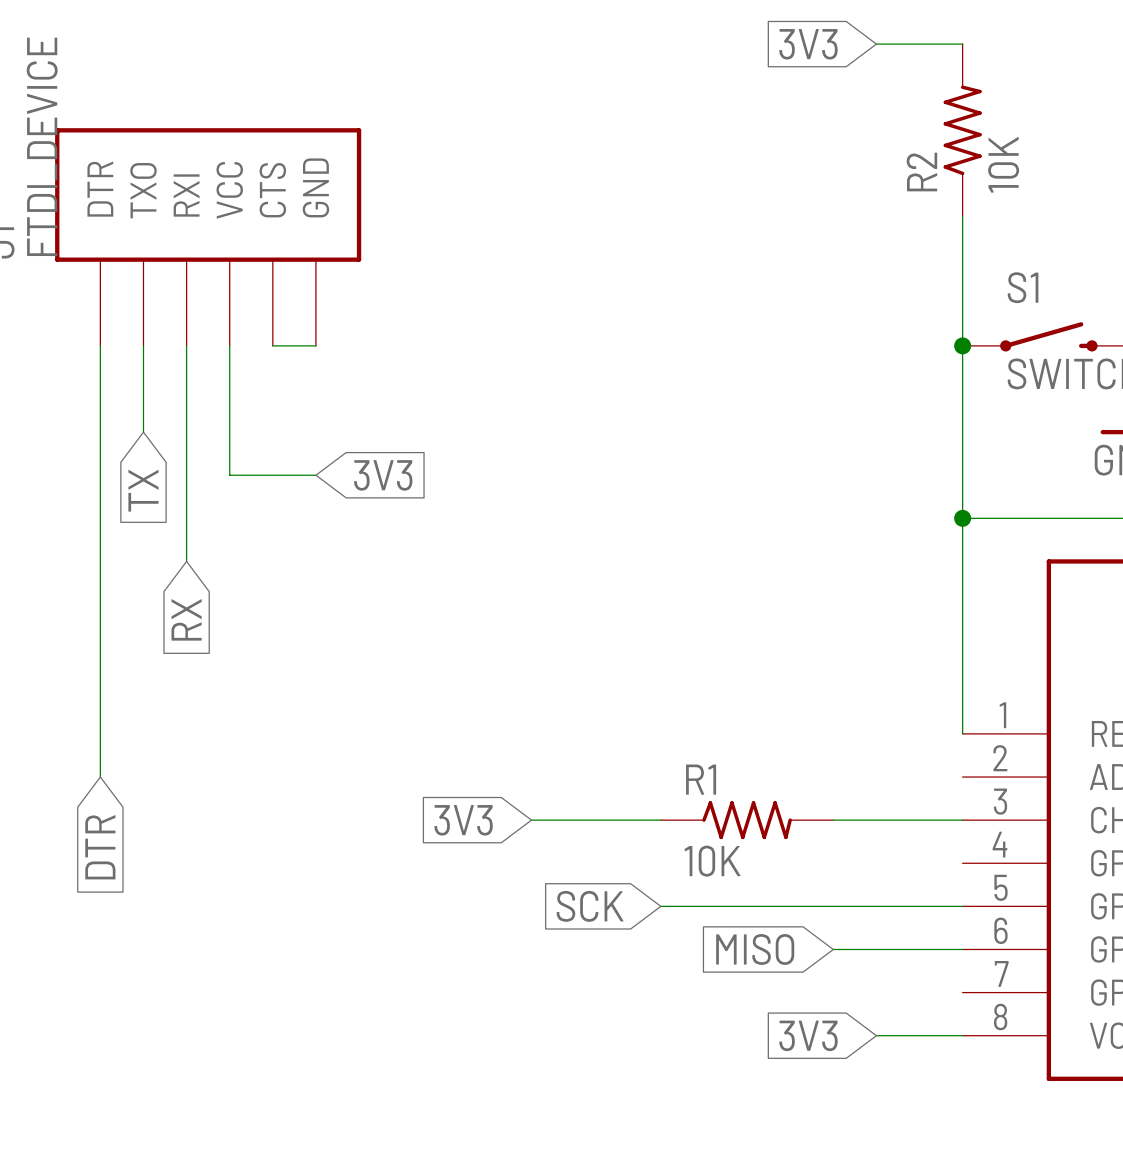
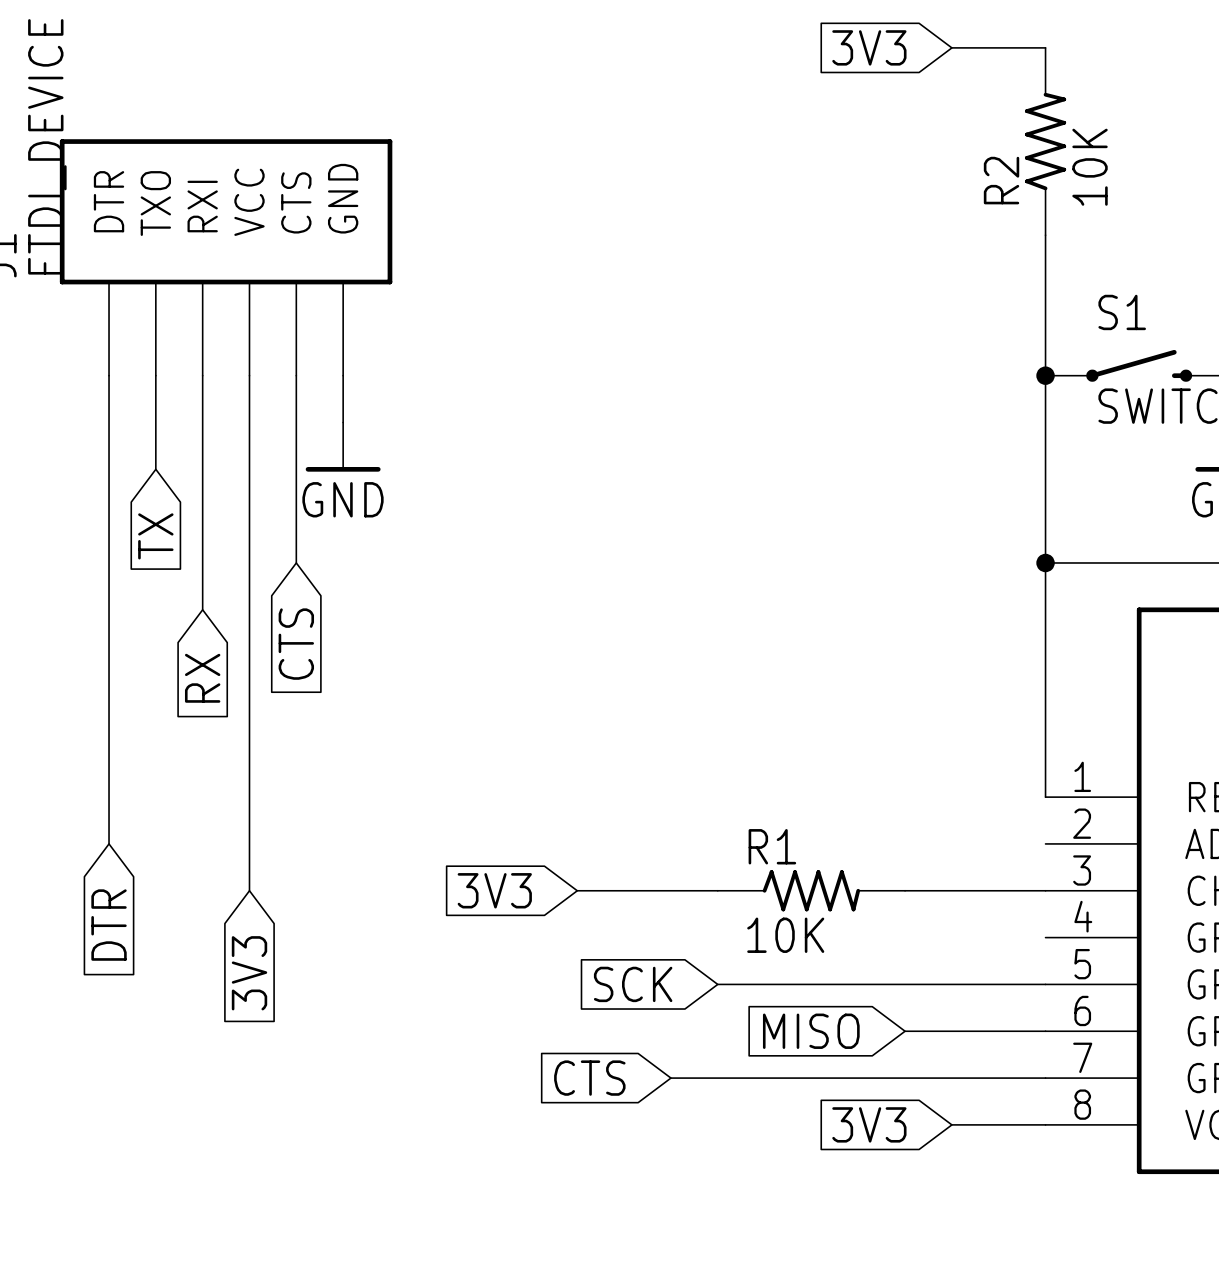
wire: (272, 345) (315, 345) -> (343, 422) (343, 375)
wire: none -> (296, 375) (296, 562)
power symbol: none -> GND (343, 447)
wire: (229, 475) (315, 475) -> (249, 516) (249, 890)
global label rotation: 0° (383, 475) -> 90° clockwise (249, 973)
global label position: 3V3 (383, 475) -> 3V3 (249, 973)
global label: none -> CTS (296, 644)
global label: none -> CTS (589, 1078)
wire: none -> (670, 1078) (1045, 1078)

